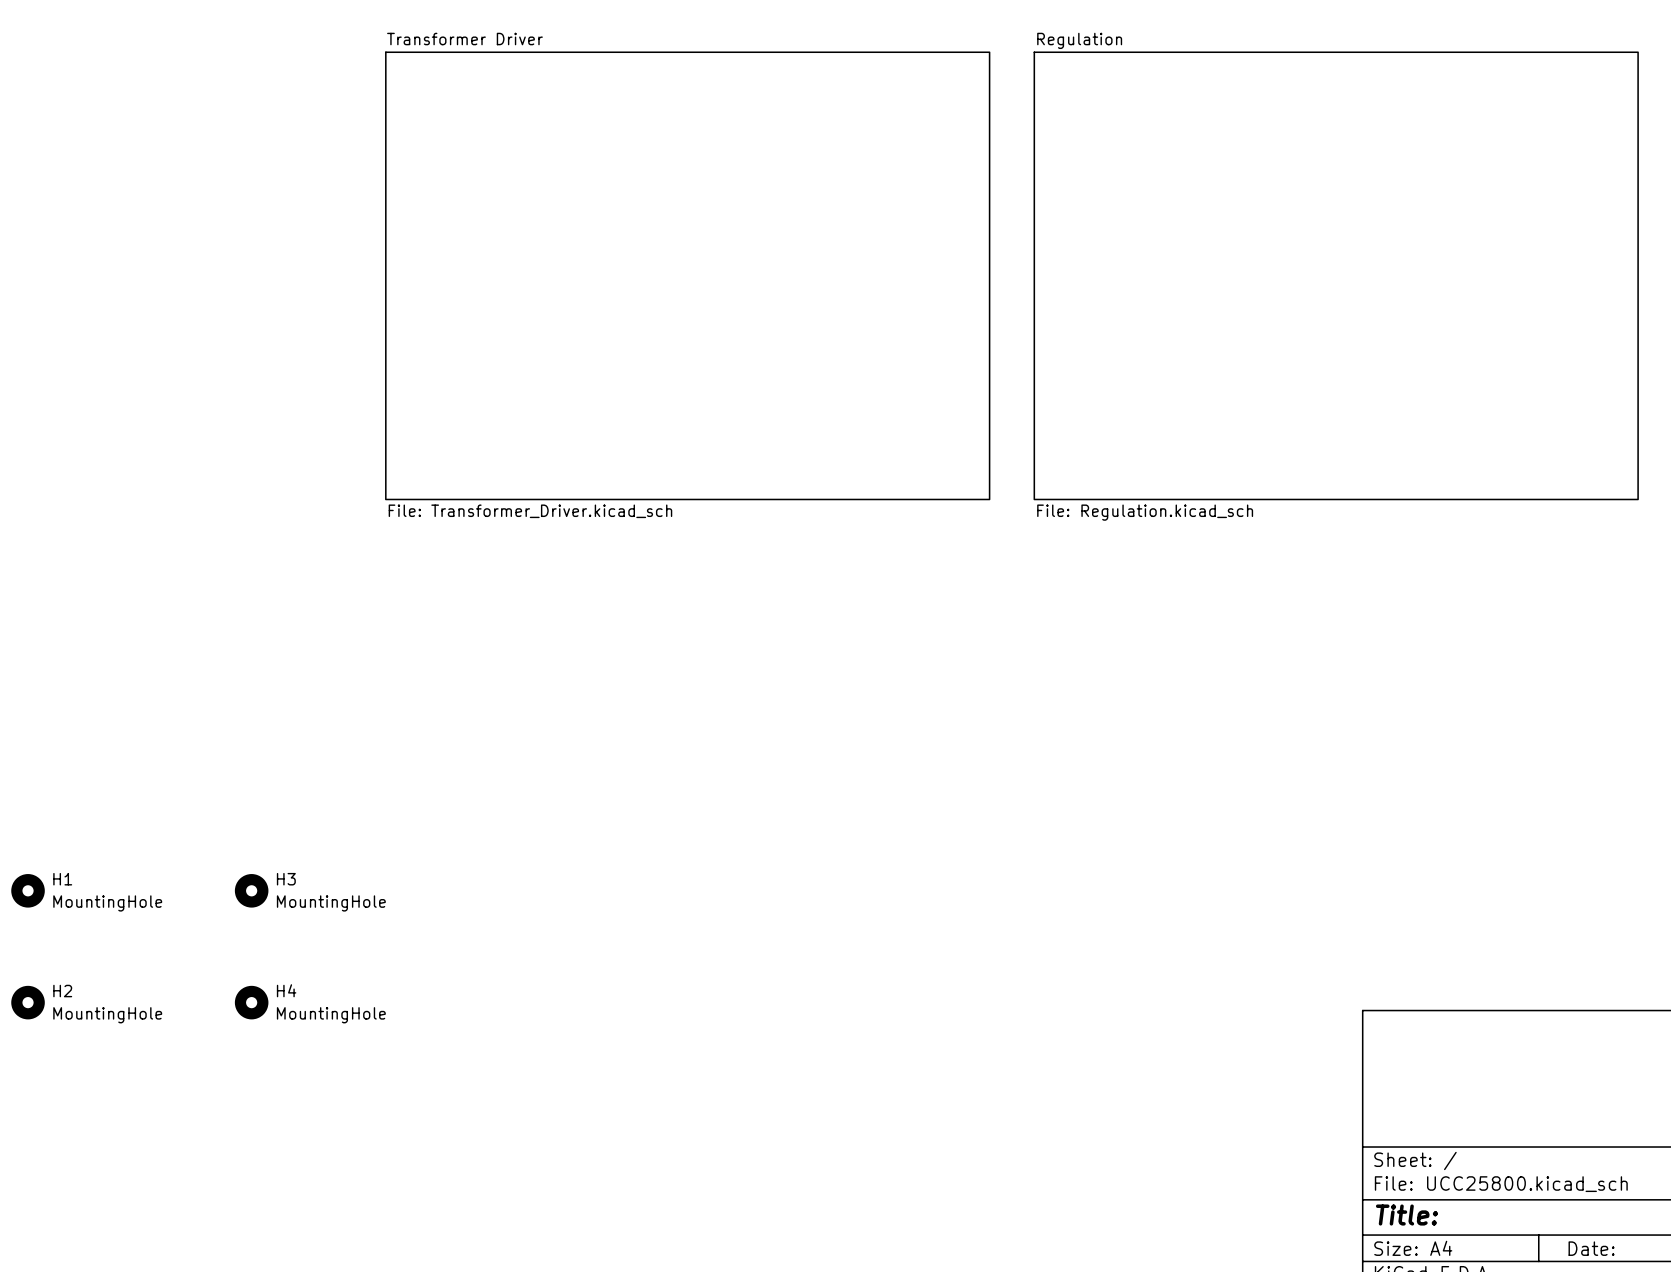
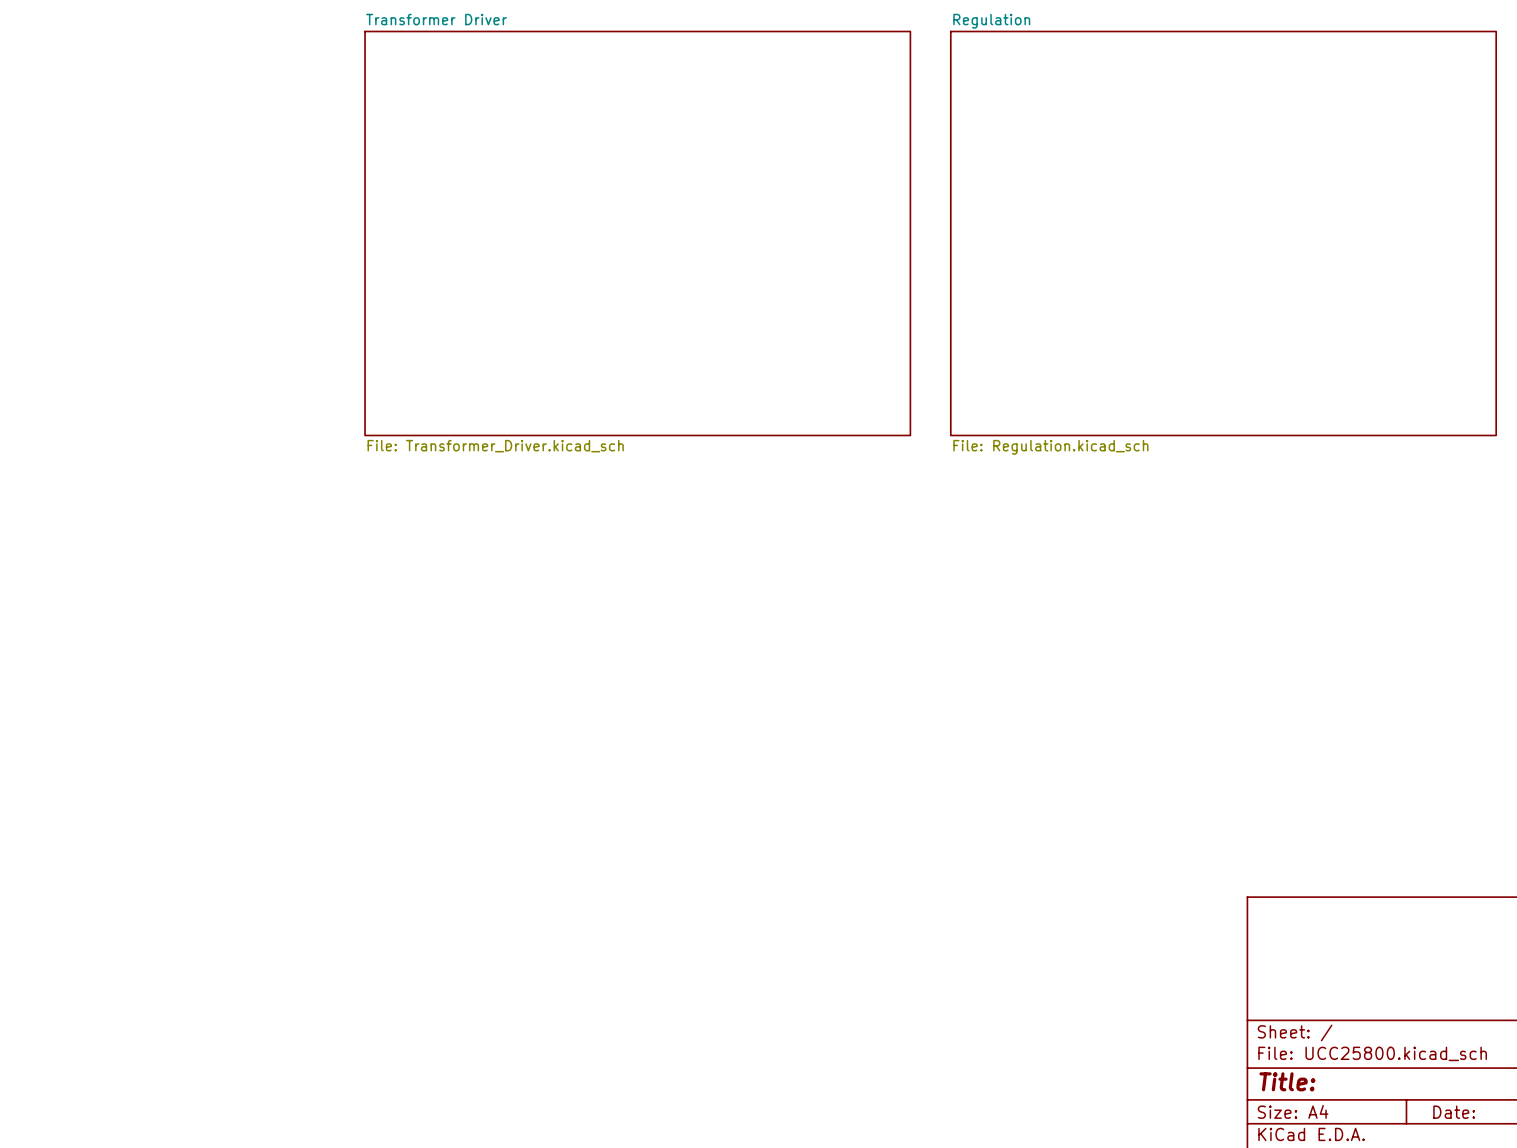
H1: MountingHole (28, 890) -> none
H3: MountingHole (251, 890) -> none
H2: MountingHole (28, 1002) -> none
H4: MountingHole (251, 1002) -> none

